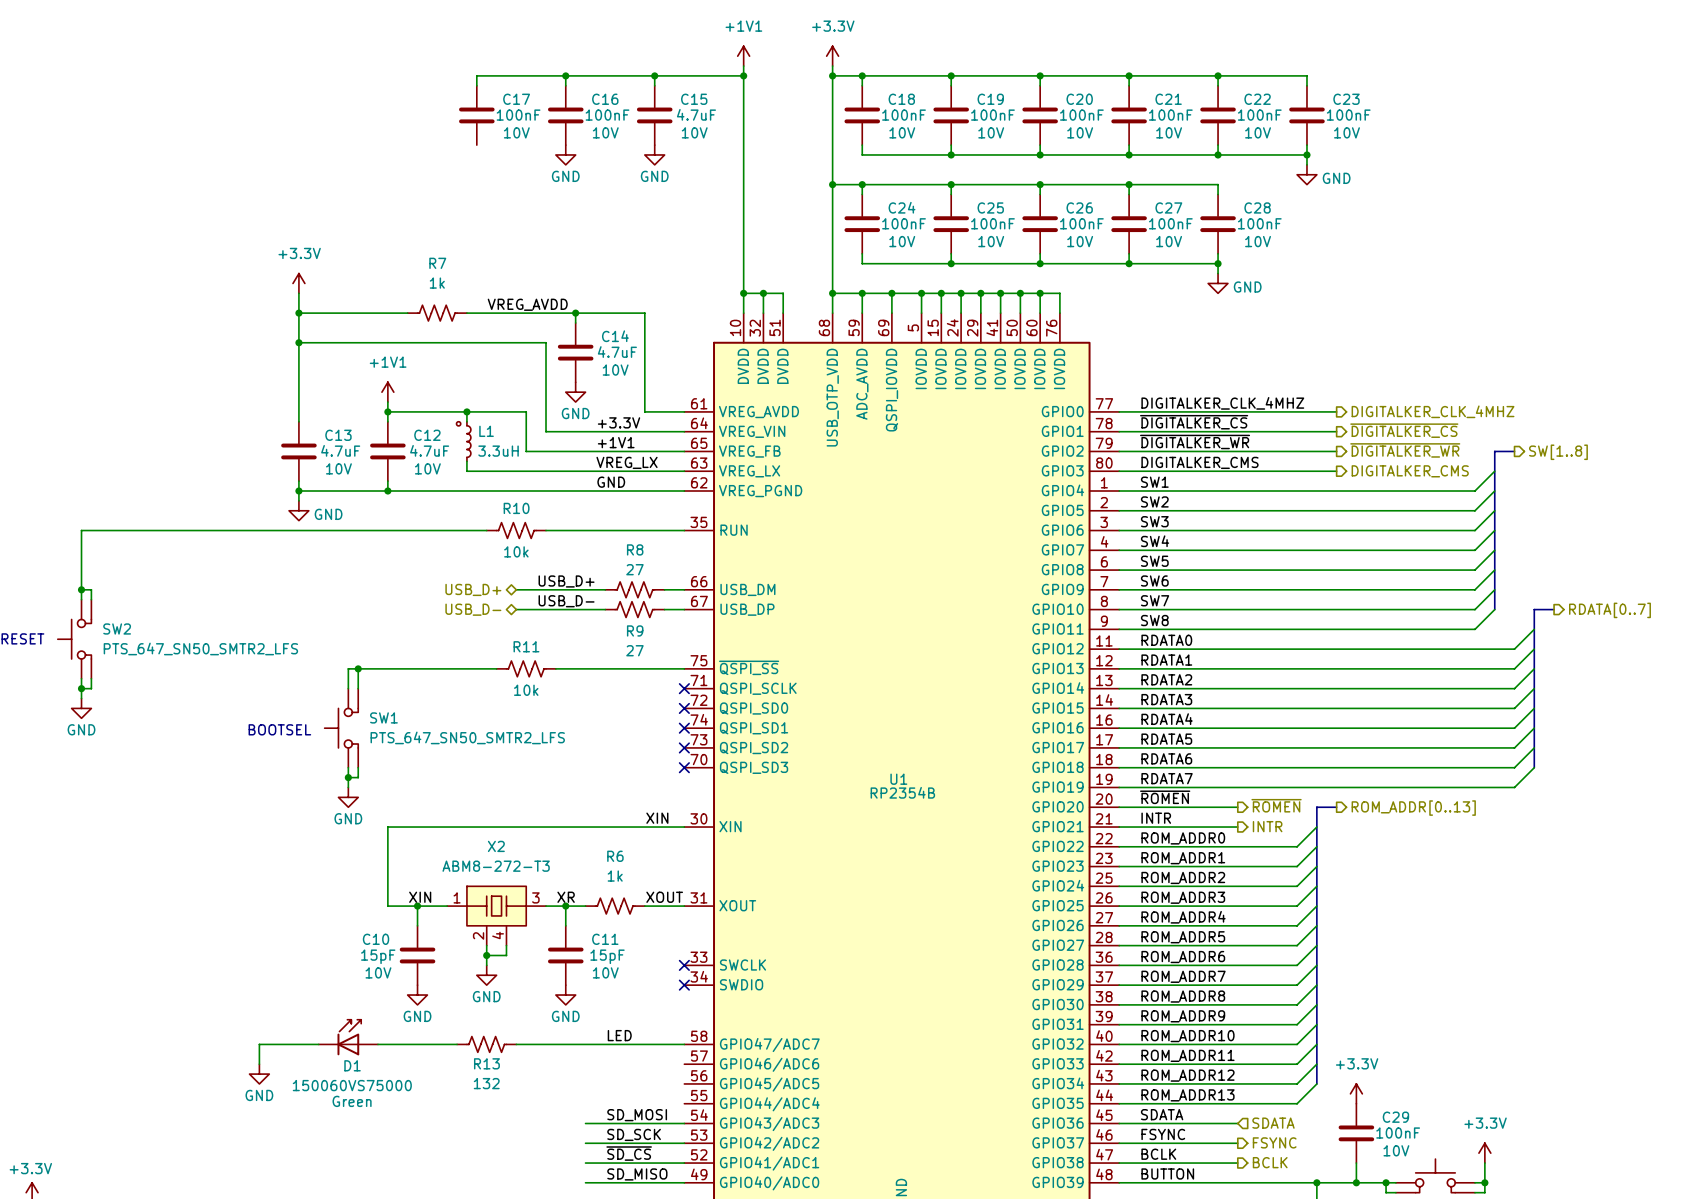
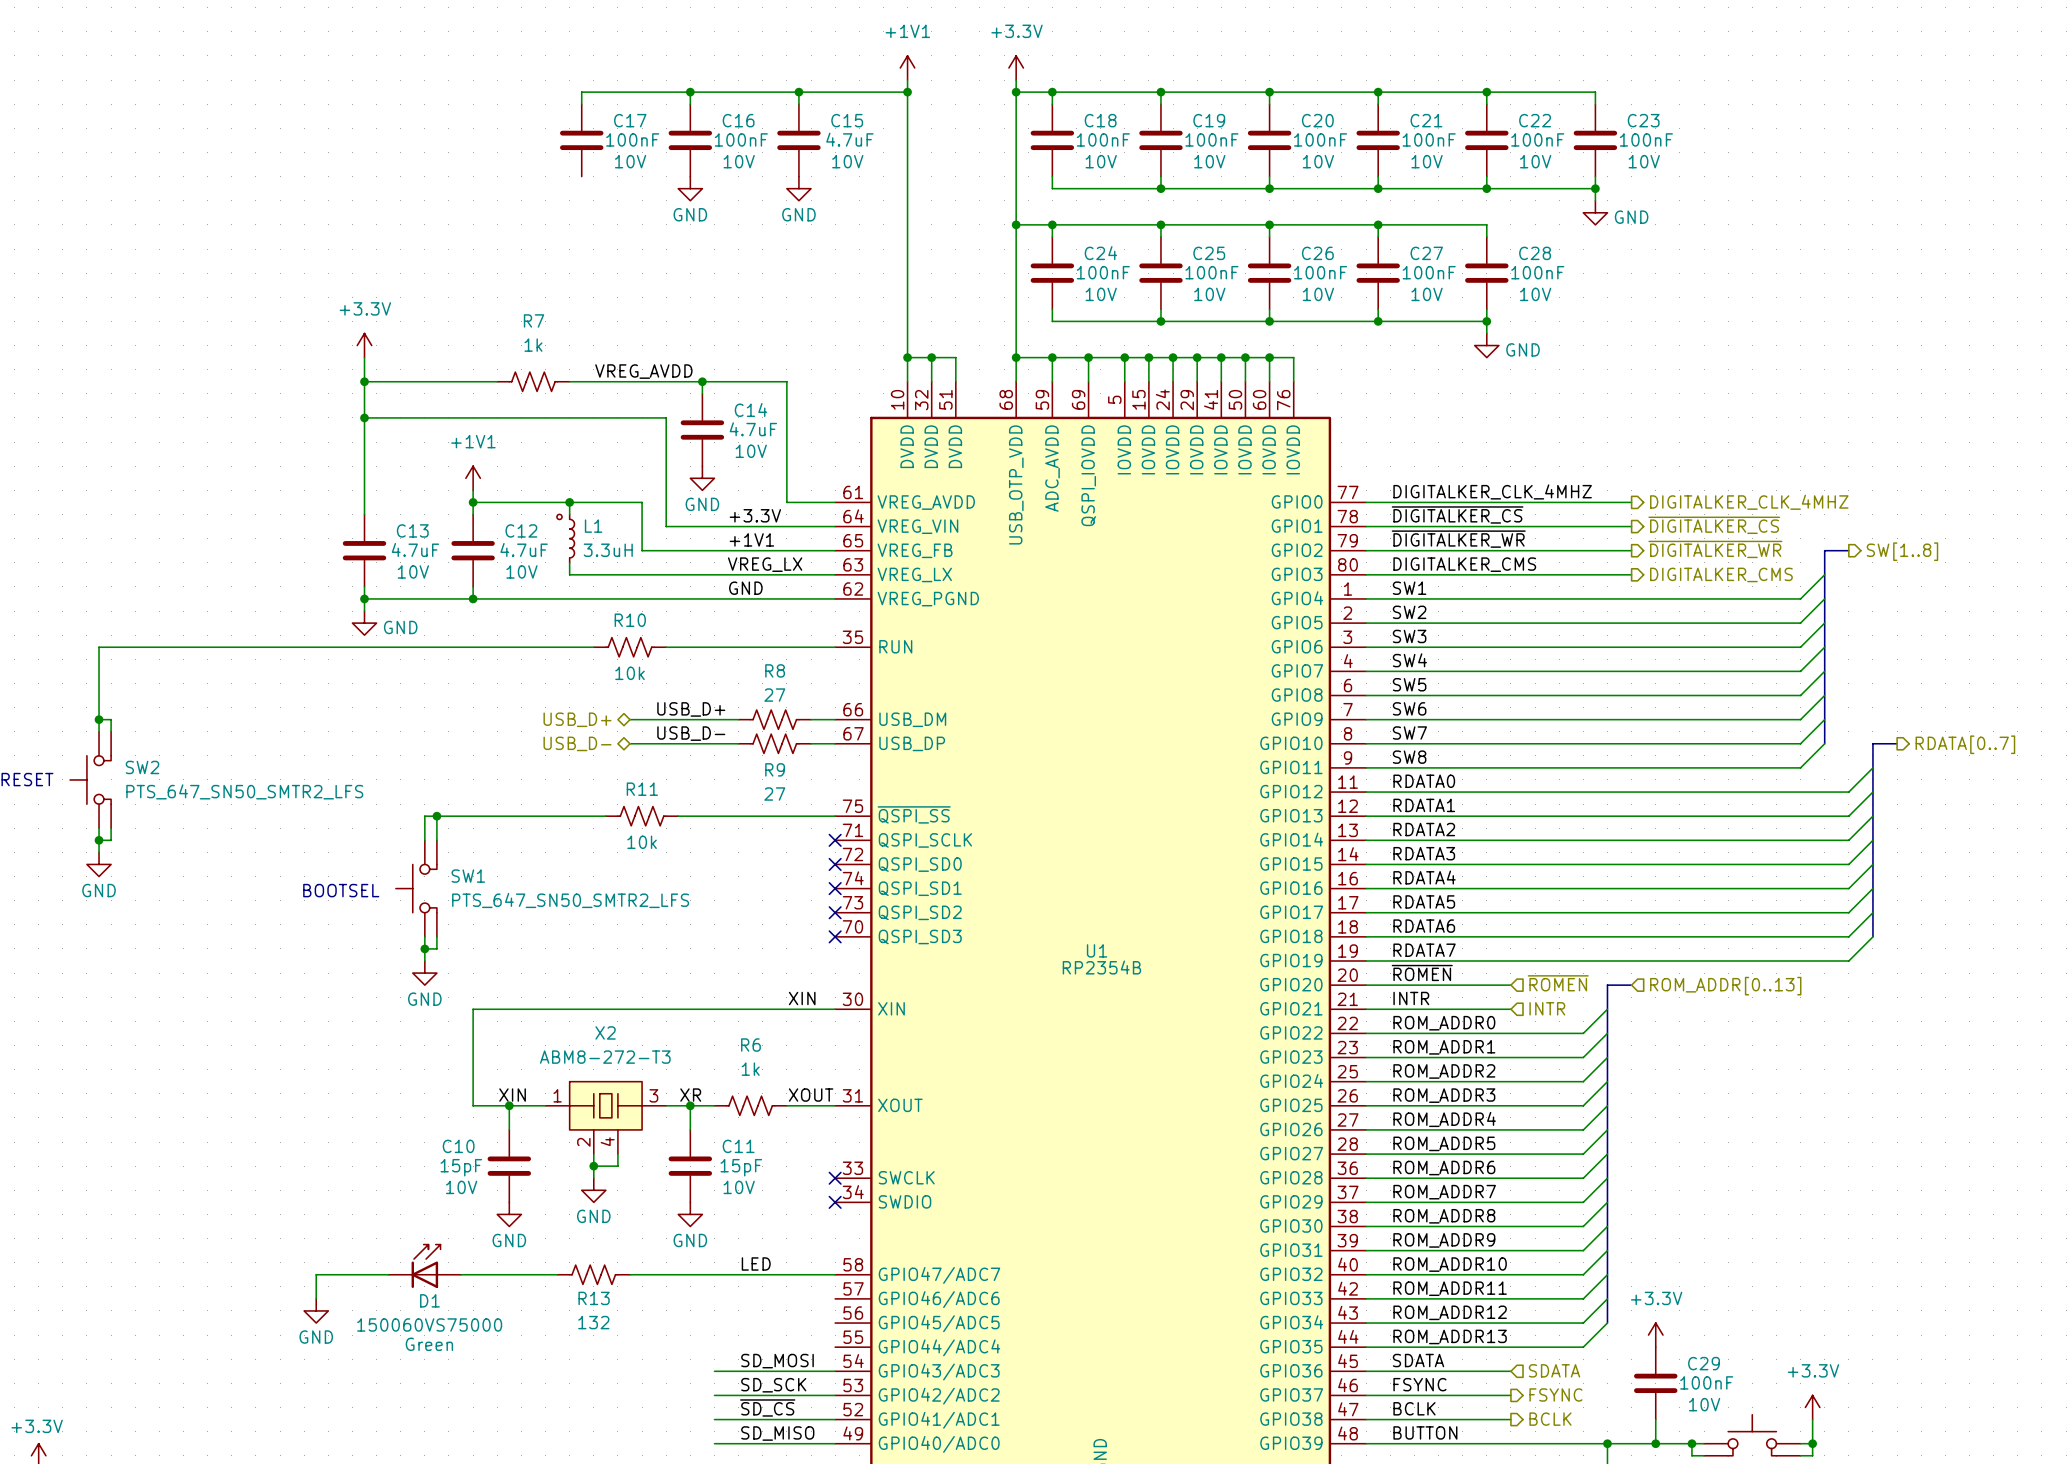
hierarchical label shape: output (1276, 805) -> input (1558, 983)
hierarchical label shape: output (1413, 808) -> input (1725, 986)
hierarchical label shape: output (1267, 826) -> input (1547, 1008)

